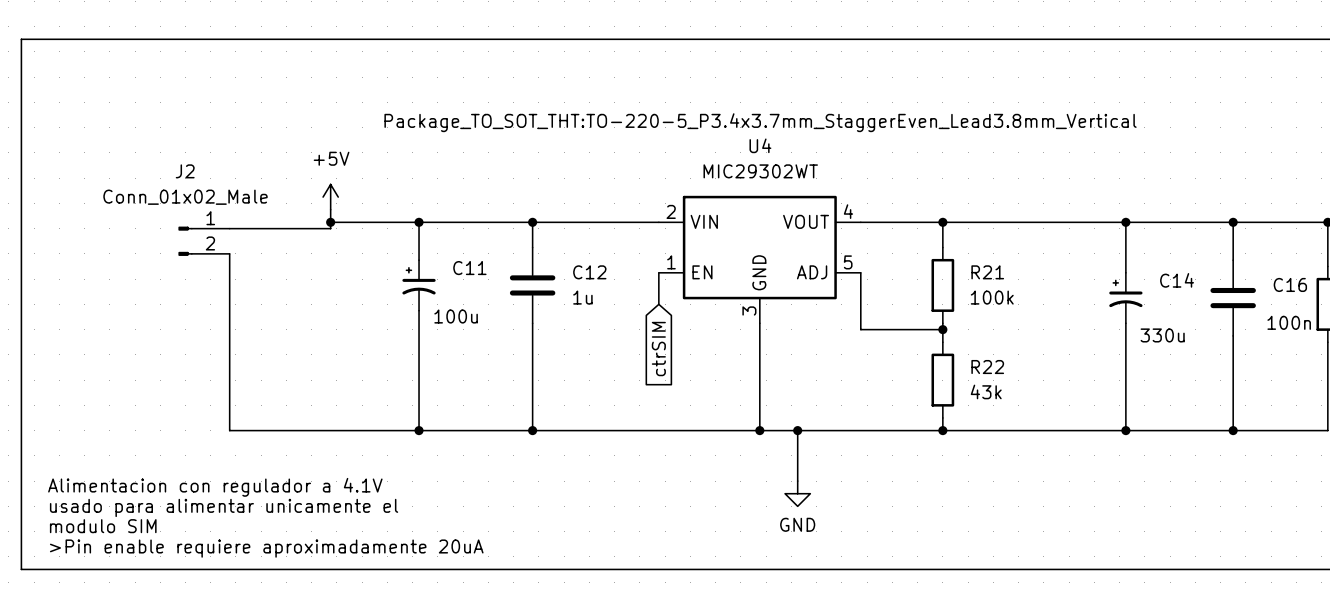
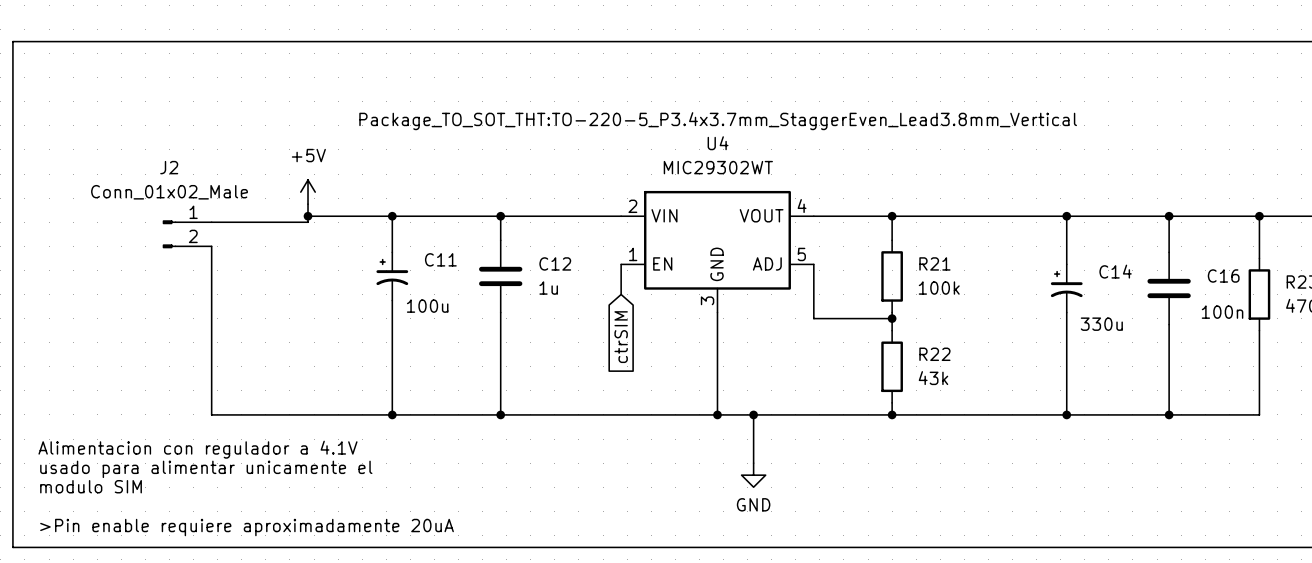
text: none -> Alimentacion con regulador a 4.1V (197, 449)
text: Alimentacion con regulador a 4.1V (215, 487) -> usado para alimentar unicamente el (206, 469)
text: usado para alimentar unicamente el (224, 507) -> modulo SIM (91, 486)
text: modulo SIM (103, 526) -> none

